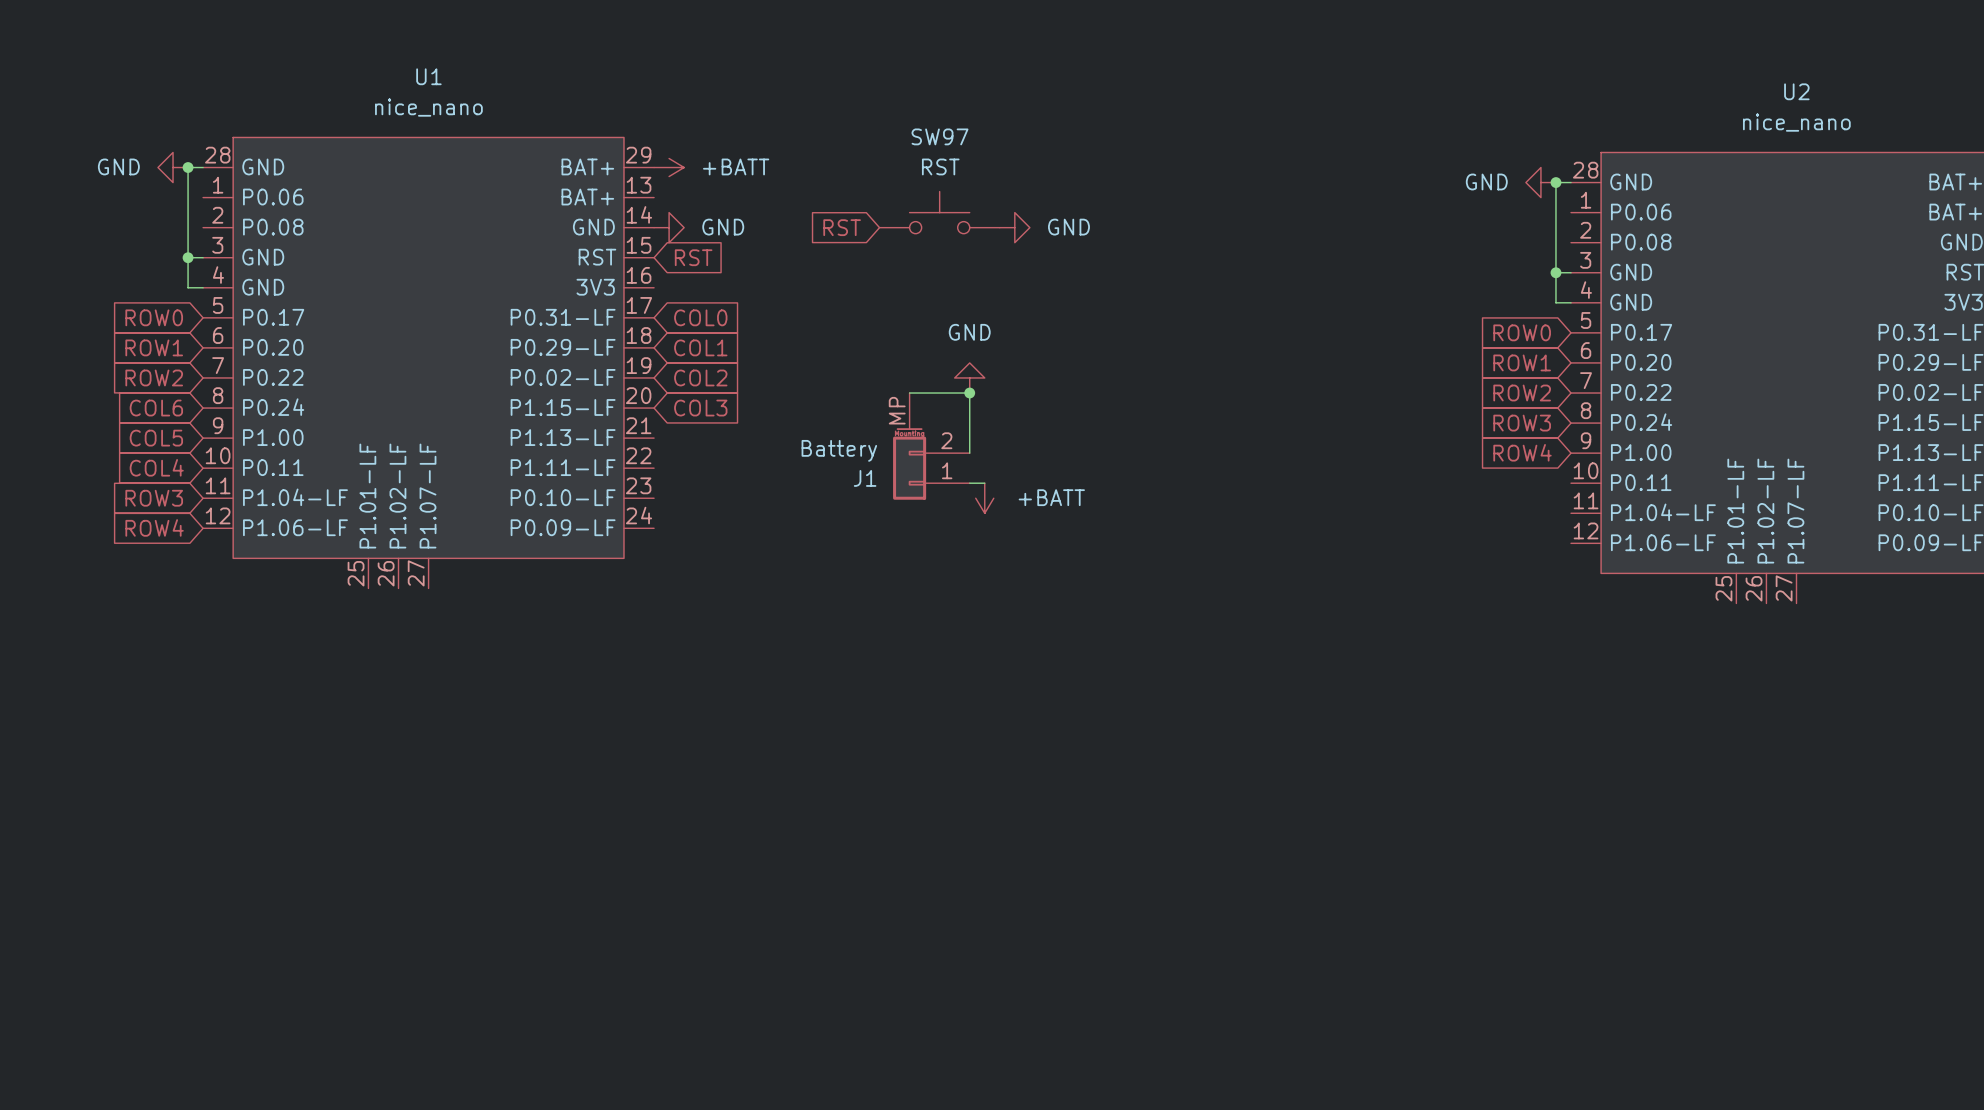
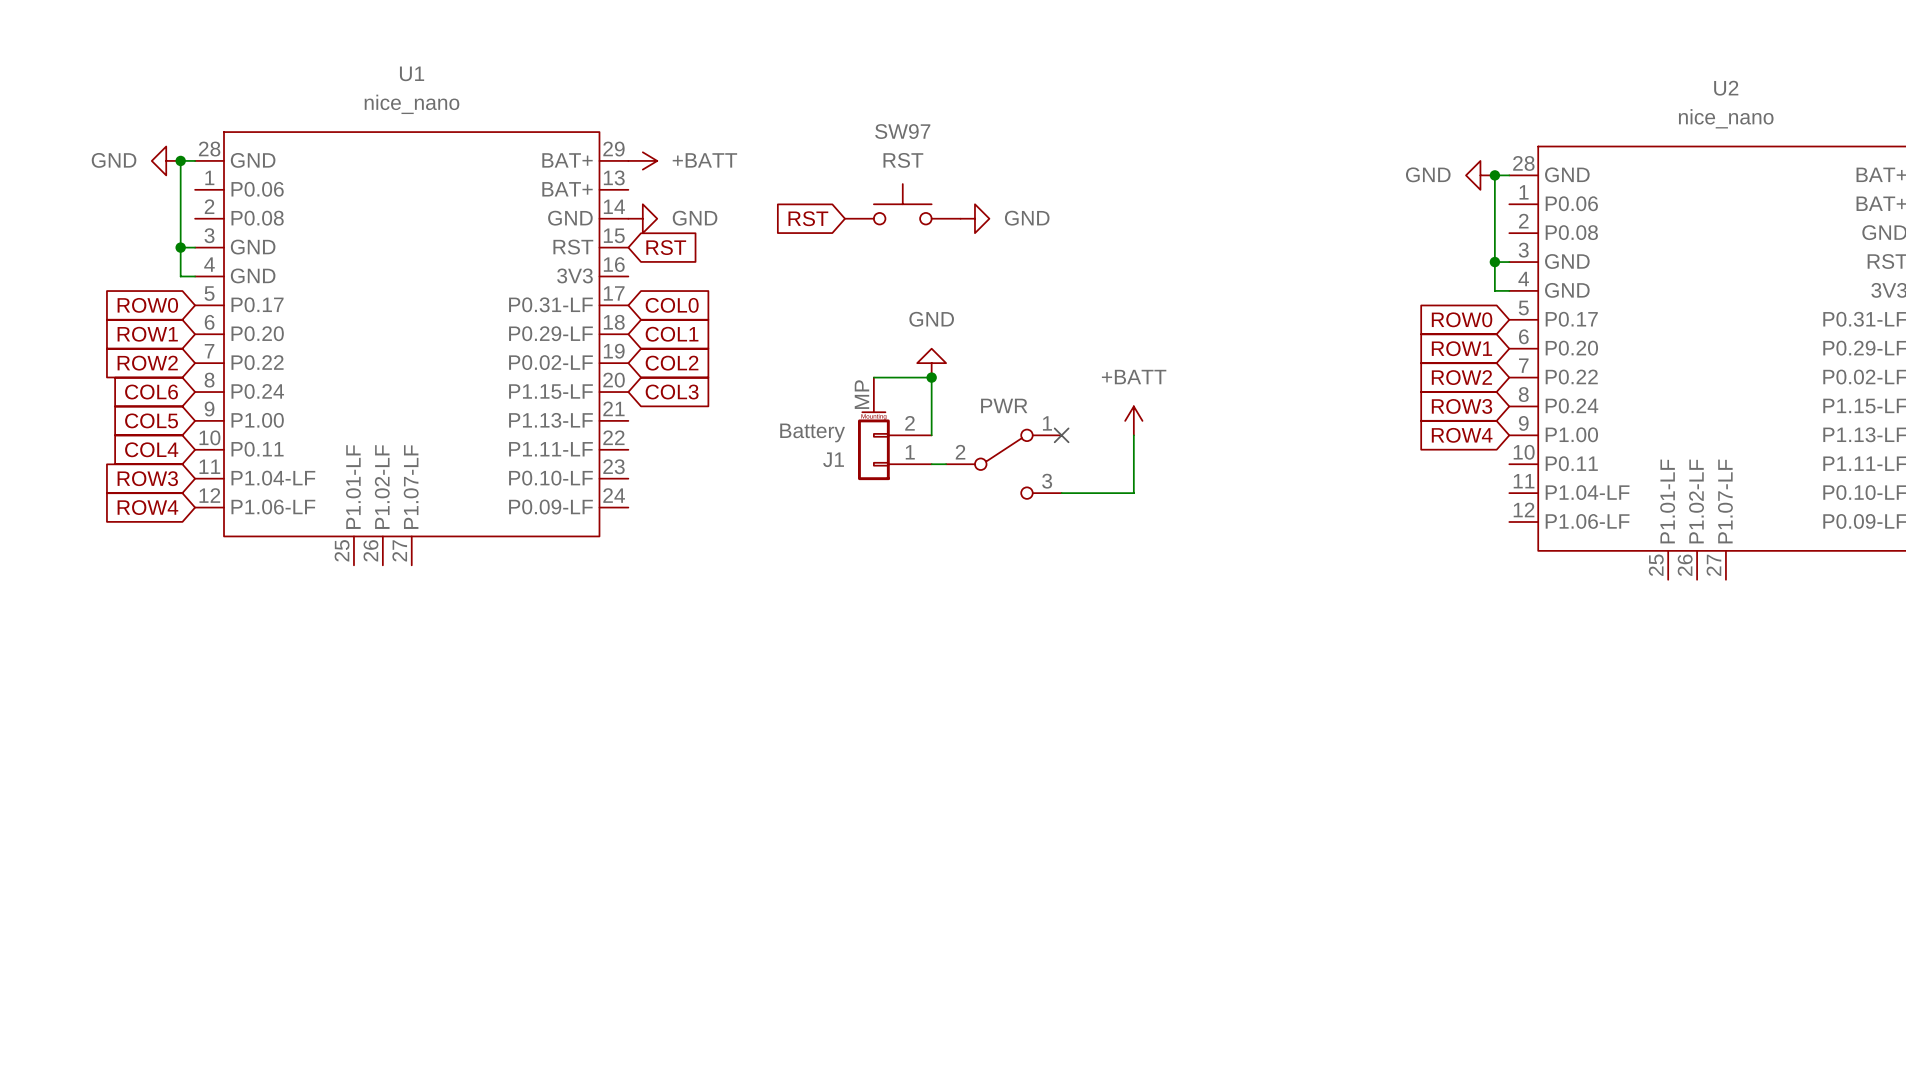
no-connect mark: none -> (1061, 435)
wire: none -> (1133, 435) (1133, 493) (1061, 493)
part: none -> PWR (1003, 464)
power symbol text position: +BATT (1051, 497) -> +BATT (1134, 377)
power symbol rotation: 0° (984, 498) -> 180° (1133, 420)
power symbol position: +BATT (984, 498) -> +BATT (1133, 420)

